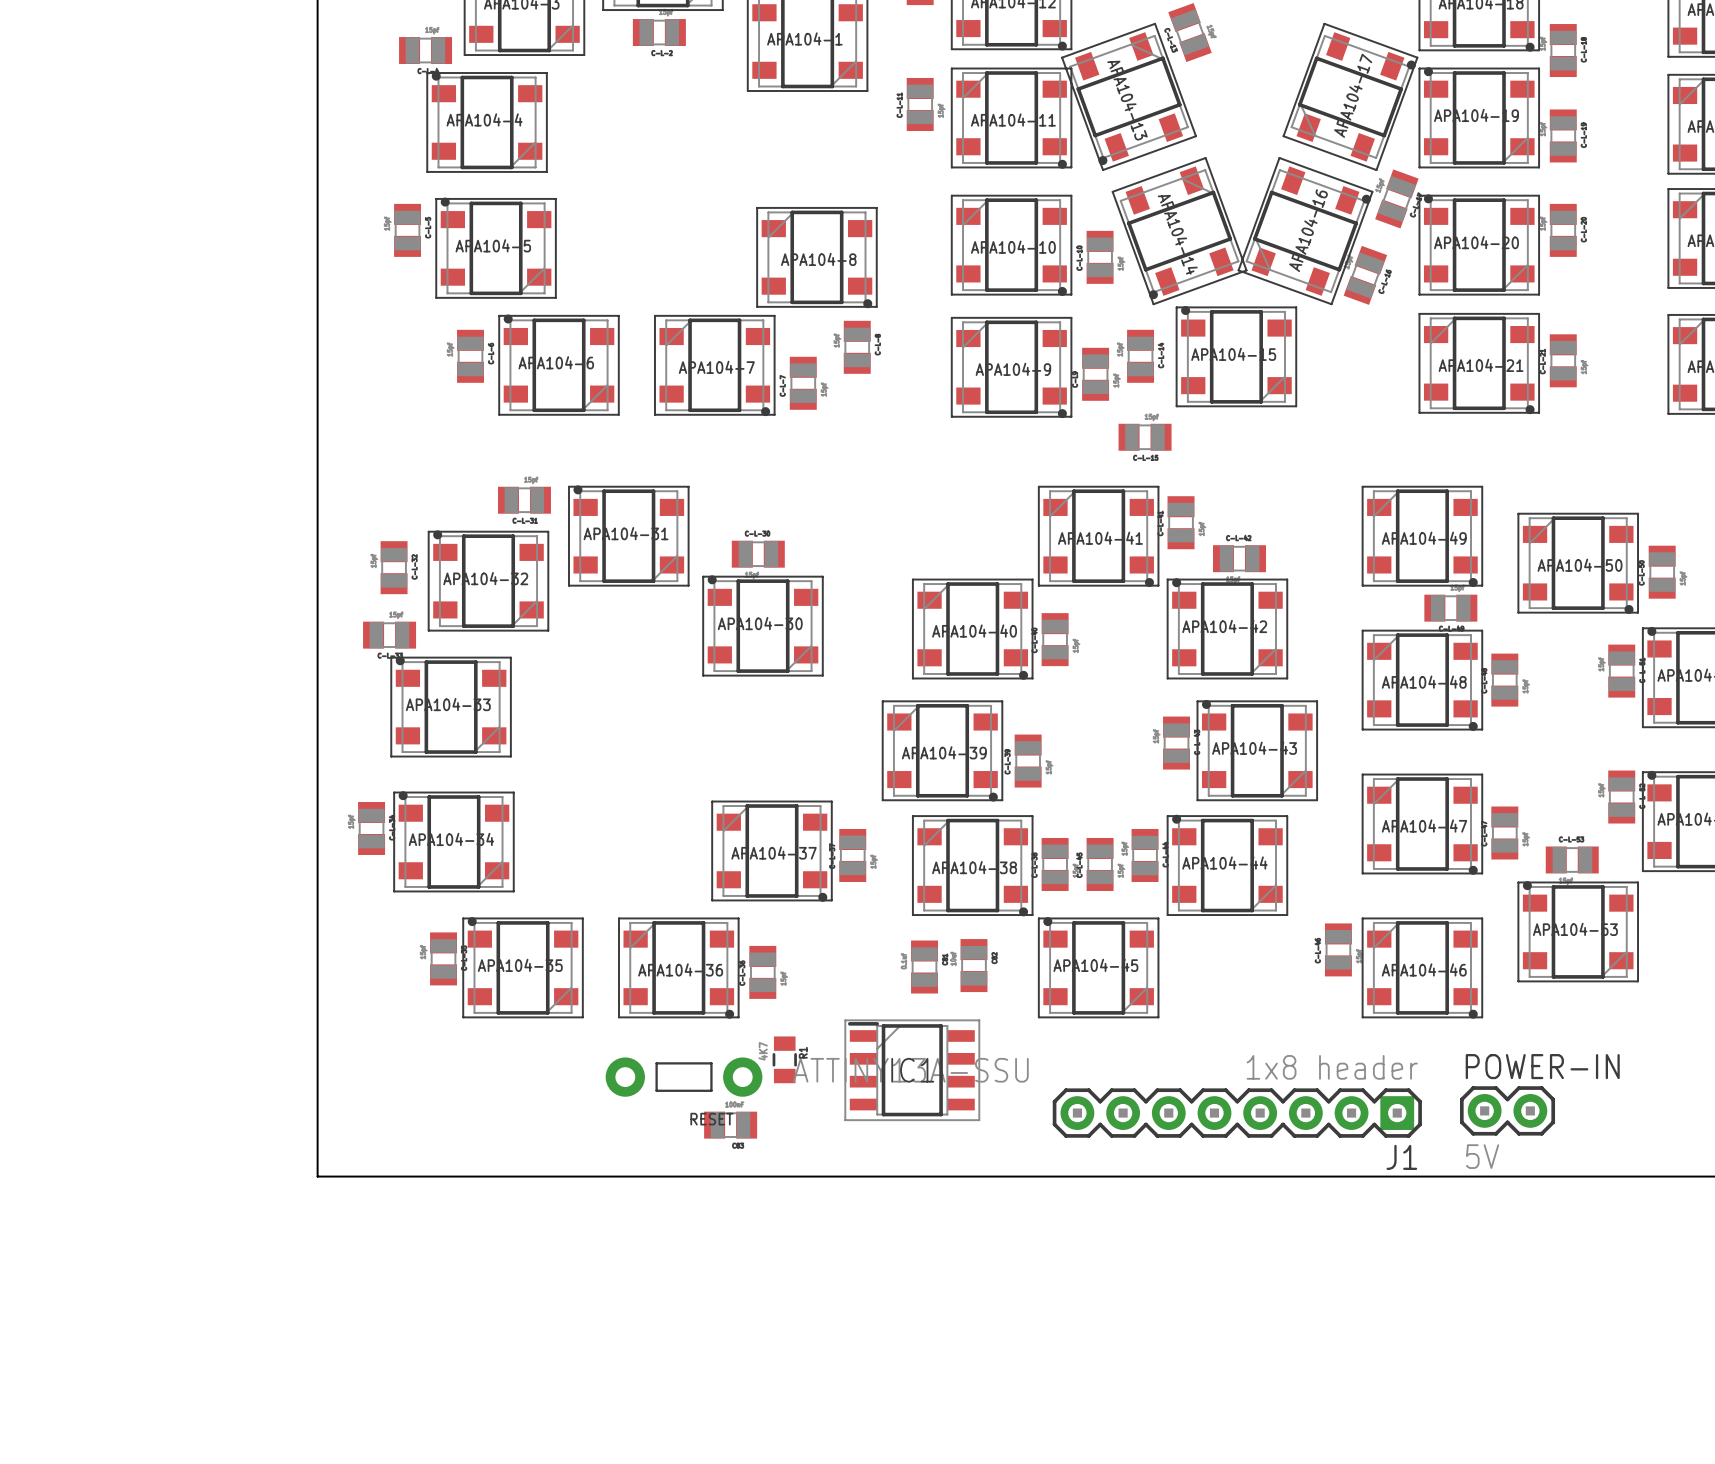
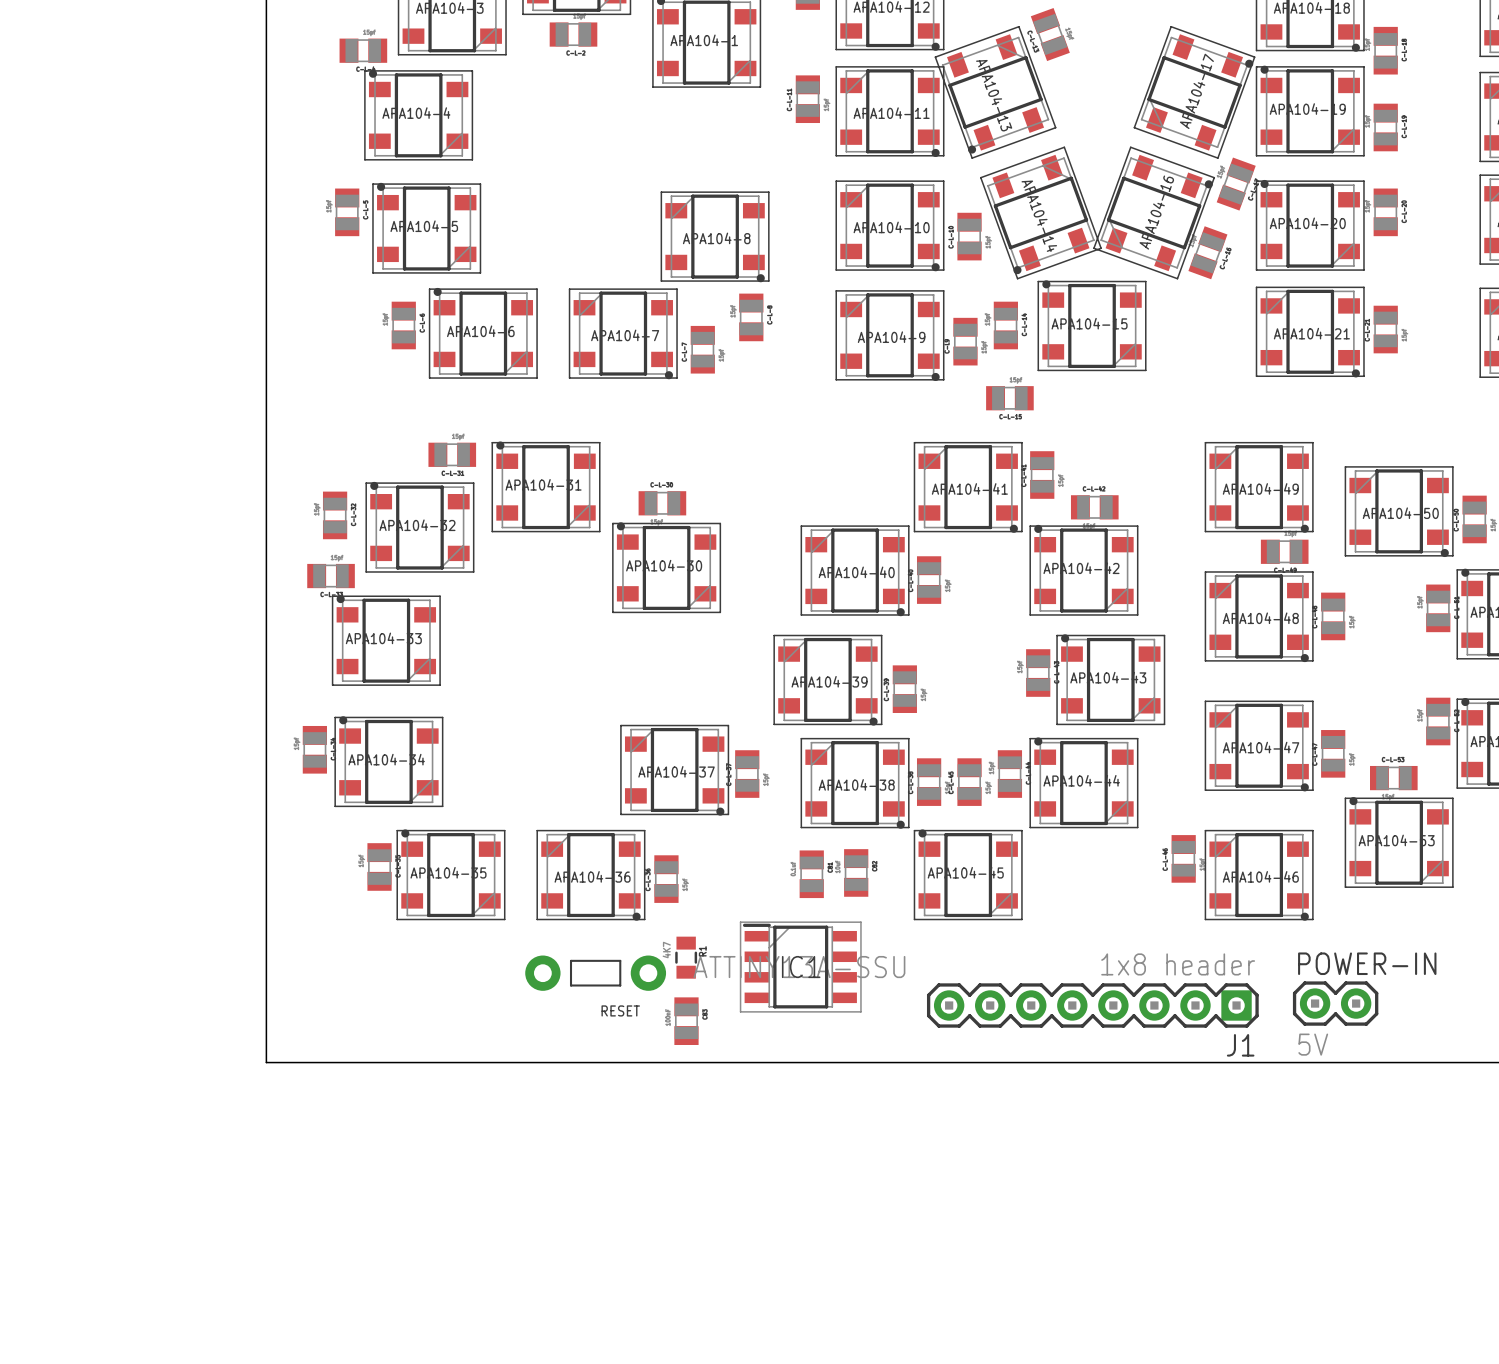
part rotation: 0° (730, 1125) -> 90° clockwise (686, 1021)
part position: (730, 1125) -> (686, 1021)

